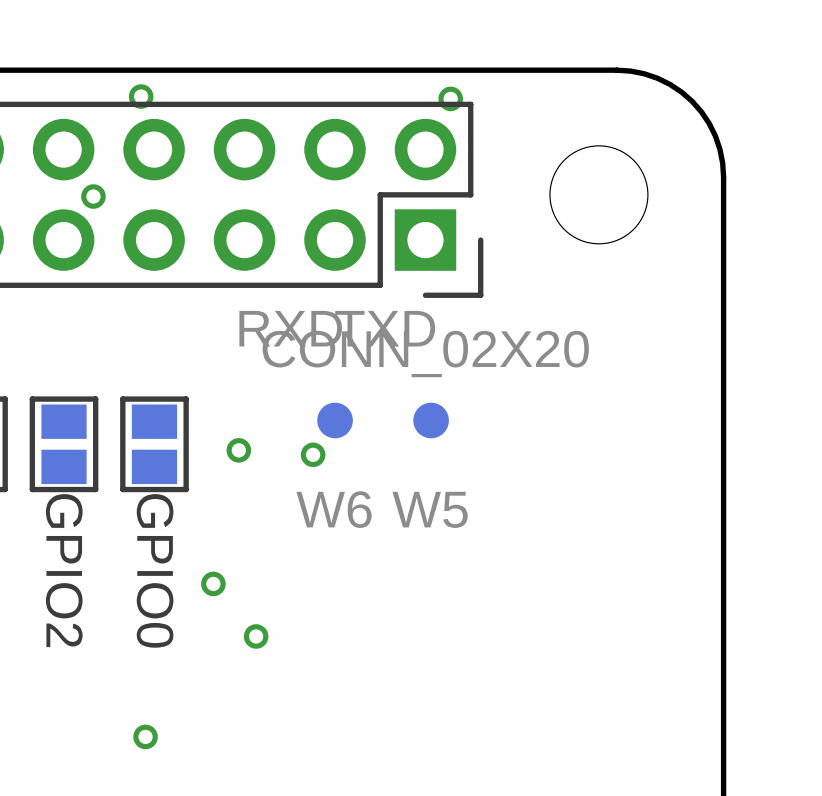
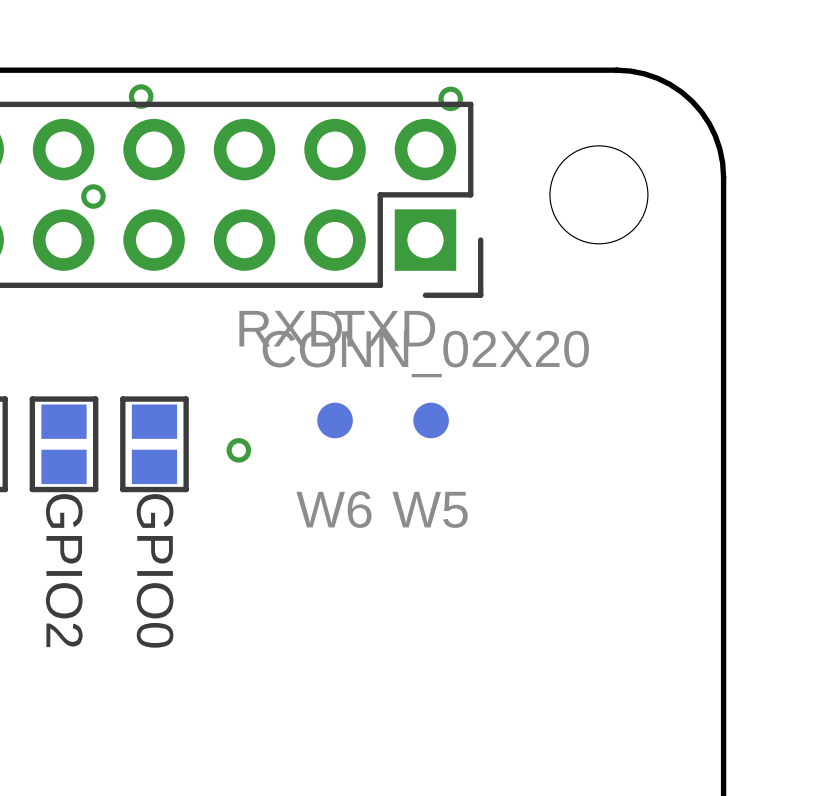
part: (313, 454) -> none
part: (213, 583) -> none
part: (256, 636) -> none
part: (145, 736) -> none

